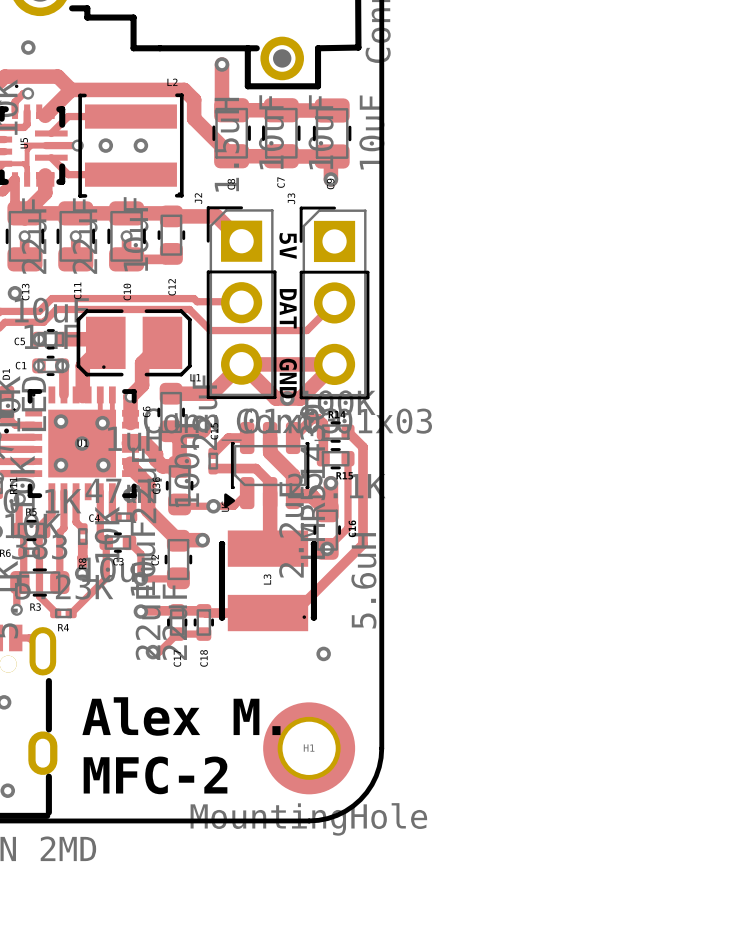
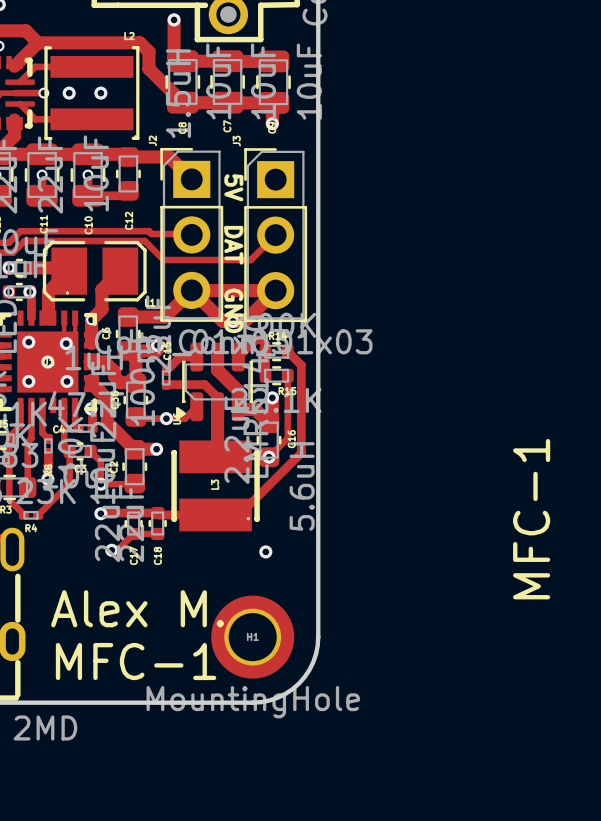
text: none -> MFC-1 (531, 519)
text: MFC-2 (155, 775) -> MFC-1 (136, 661)

